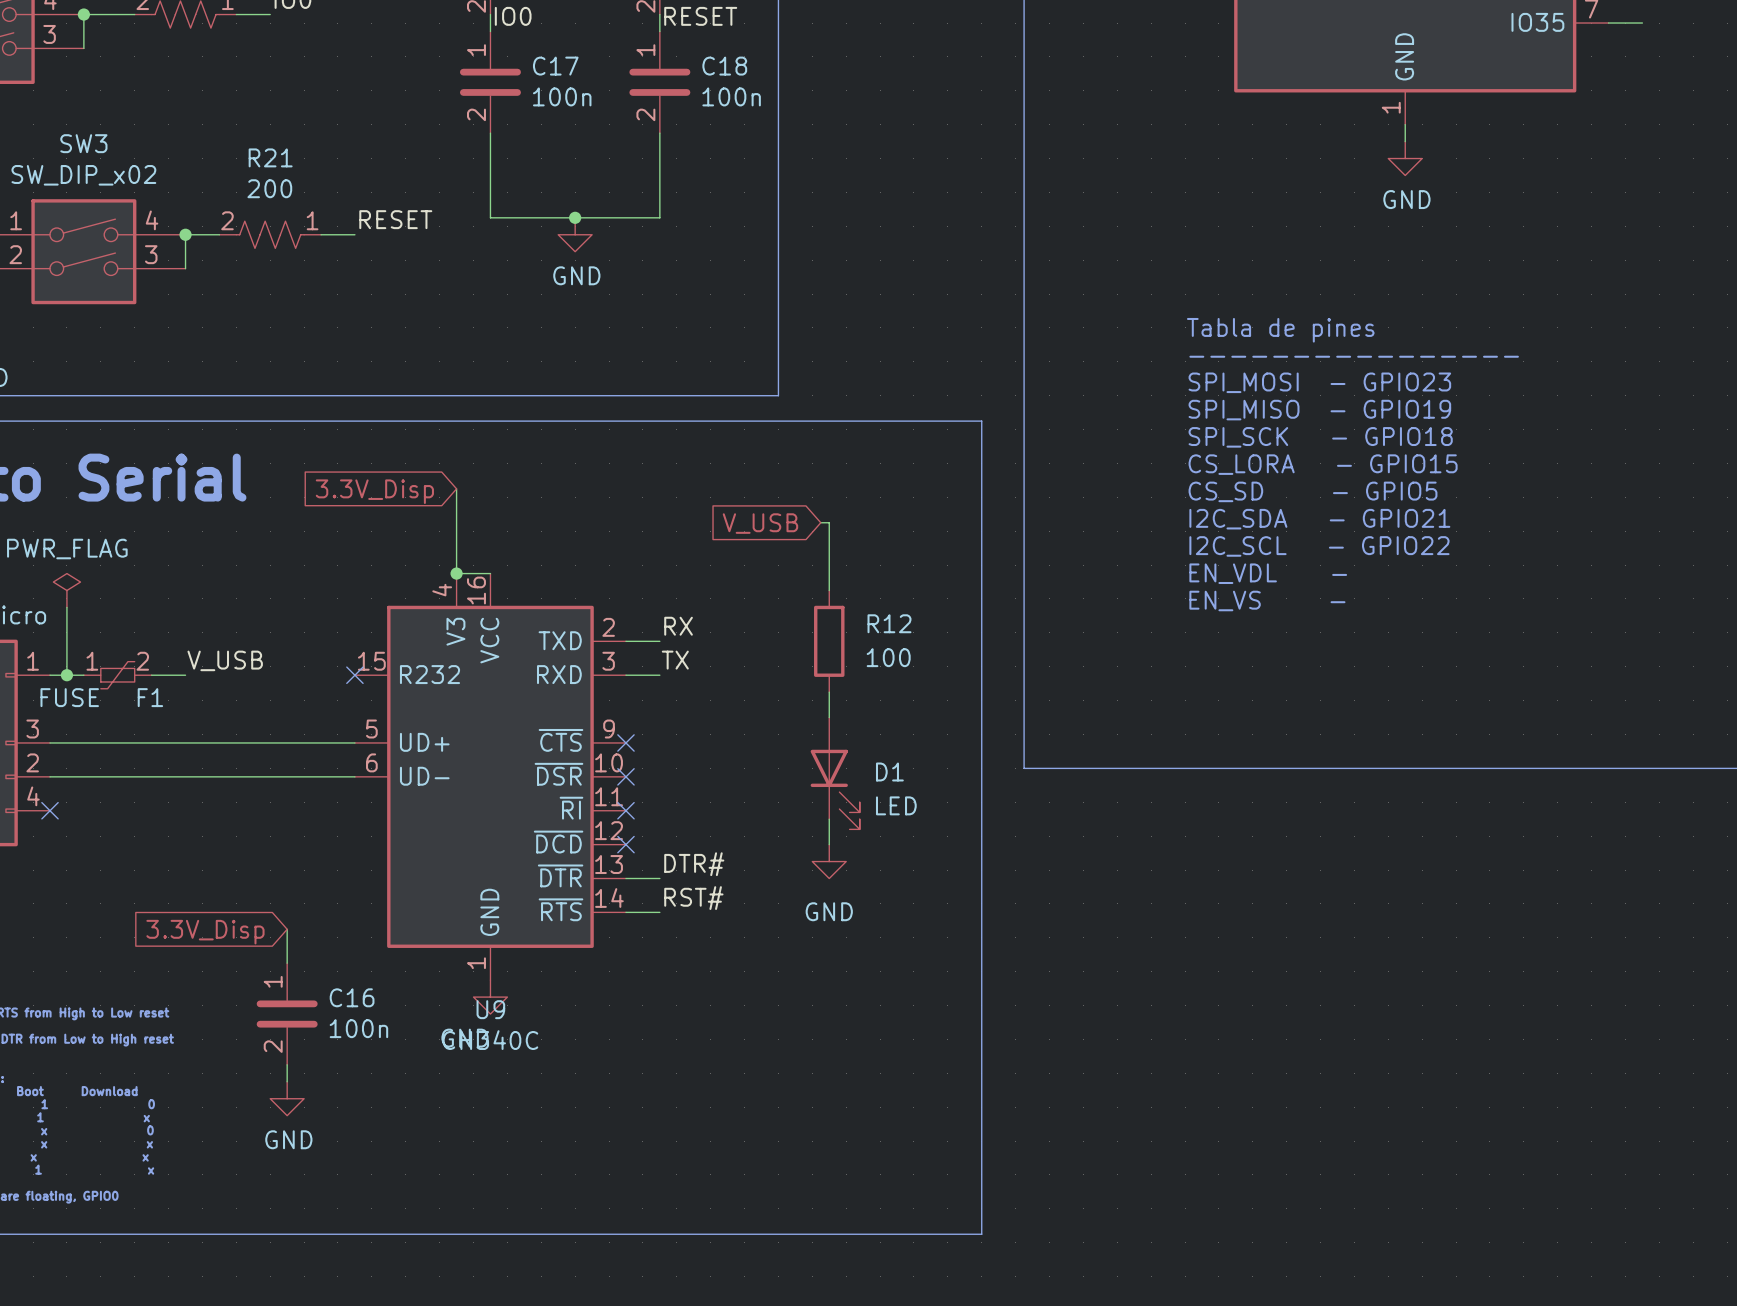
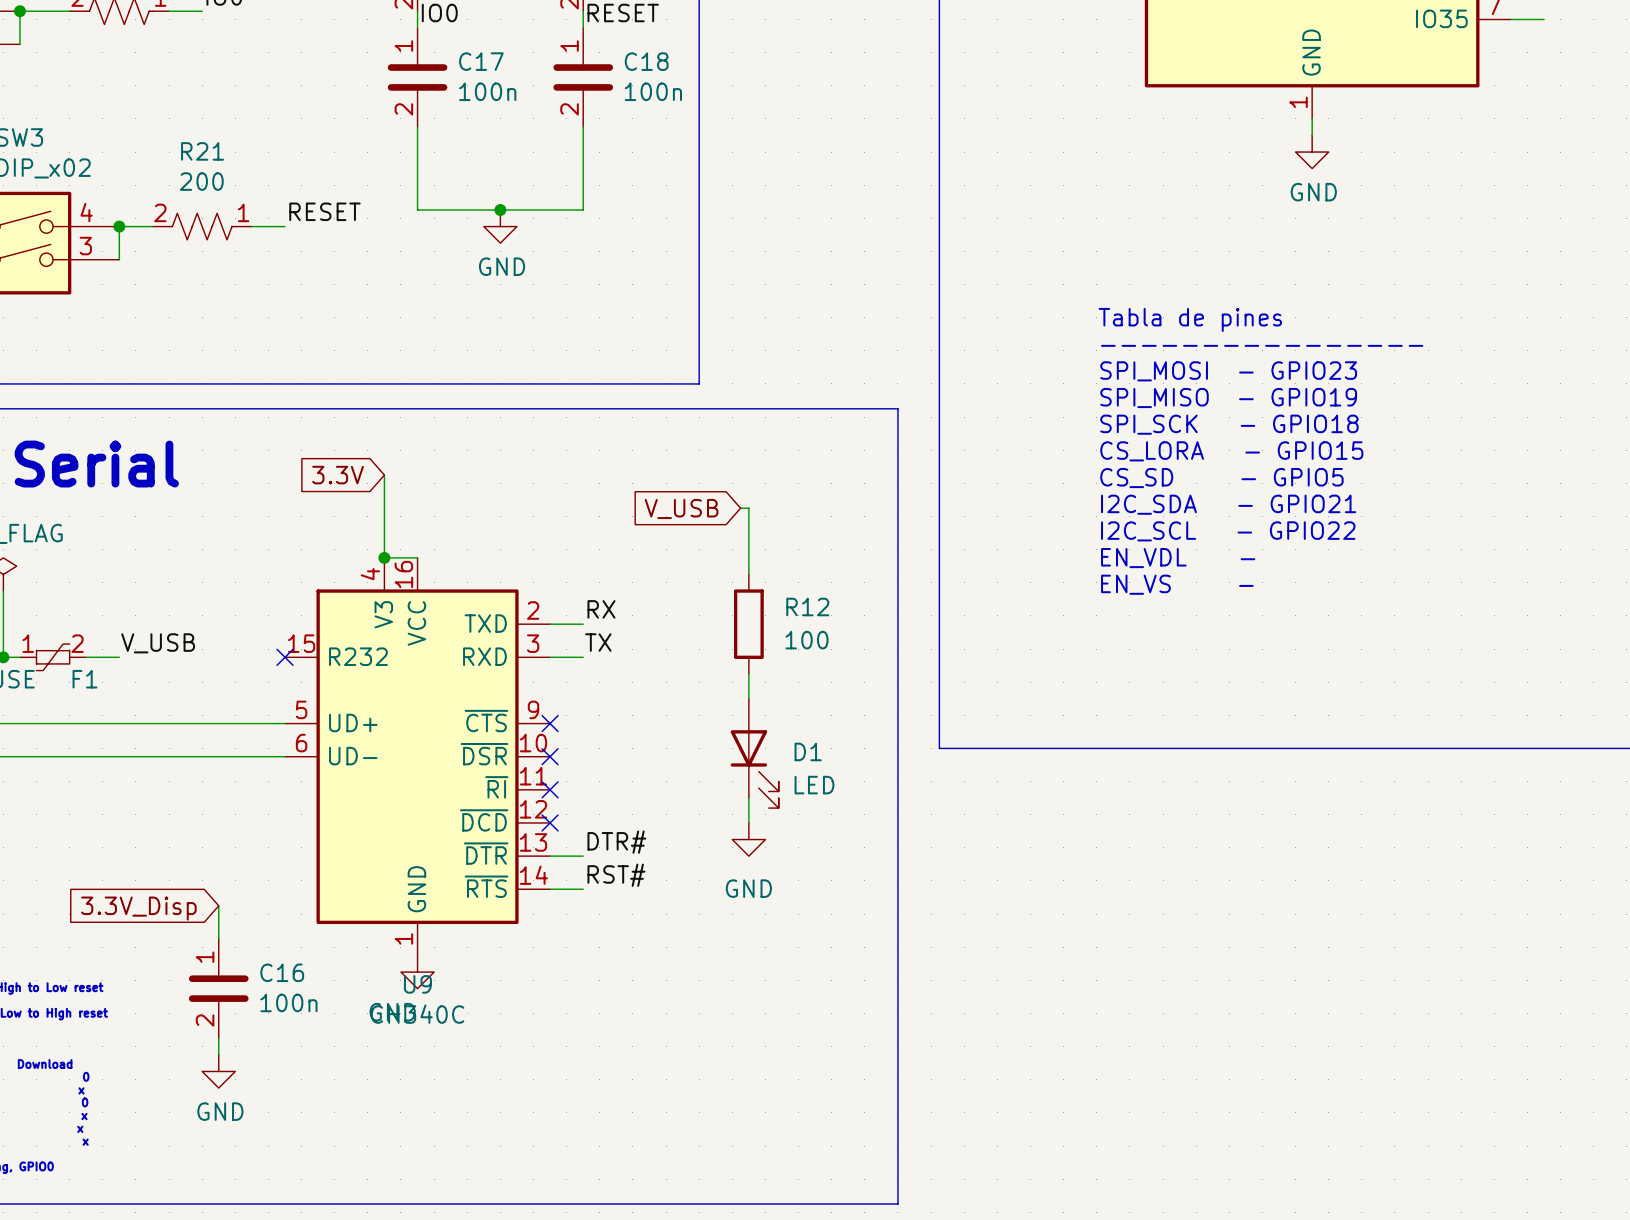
global label: 3.3V_Disp (374, 491) -> 3.3V (338, 475)

